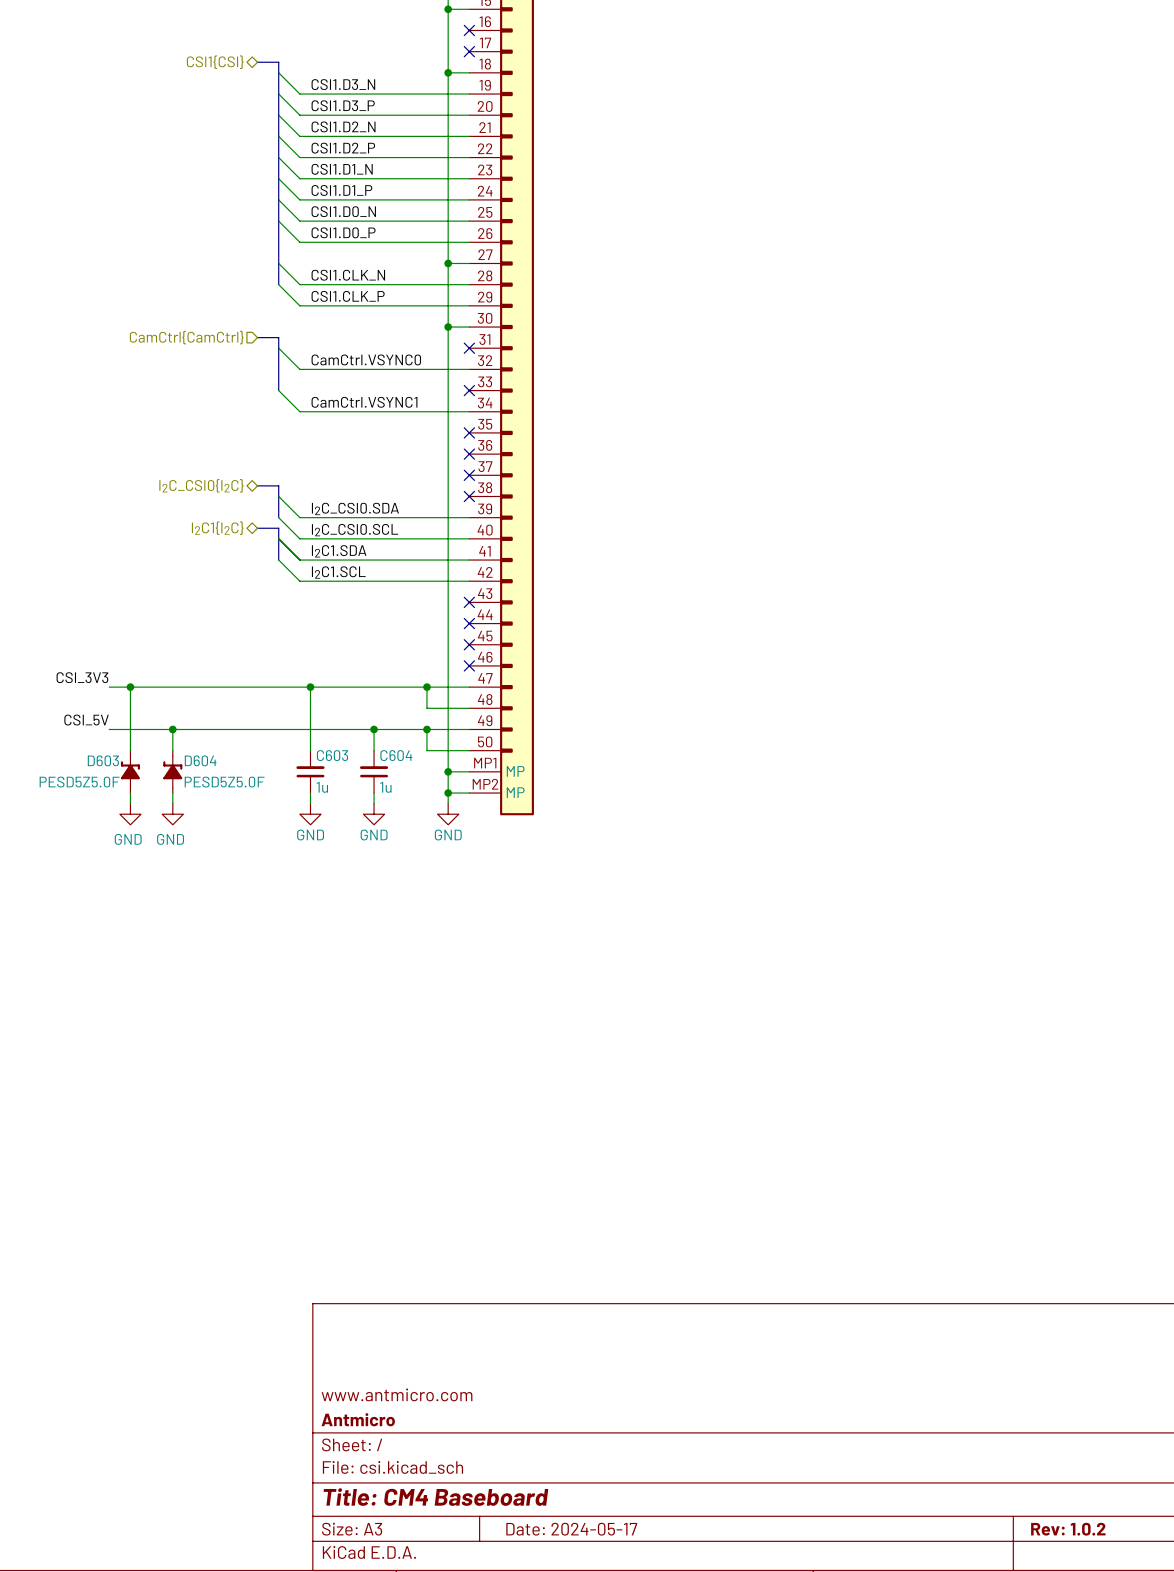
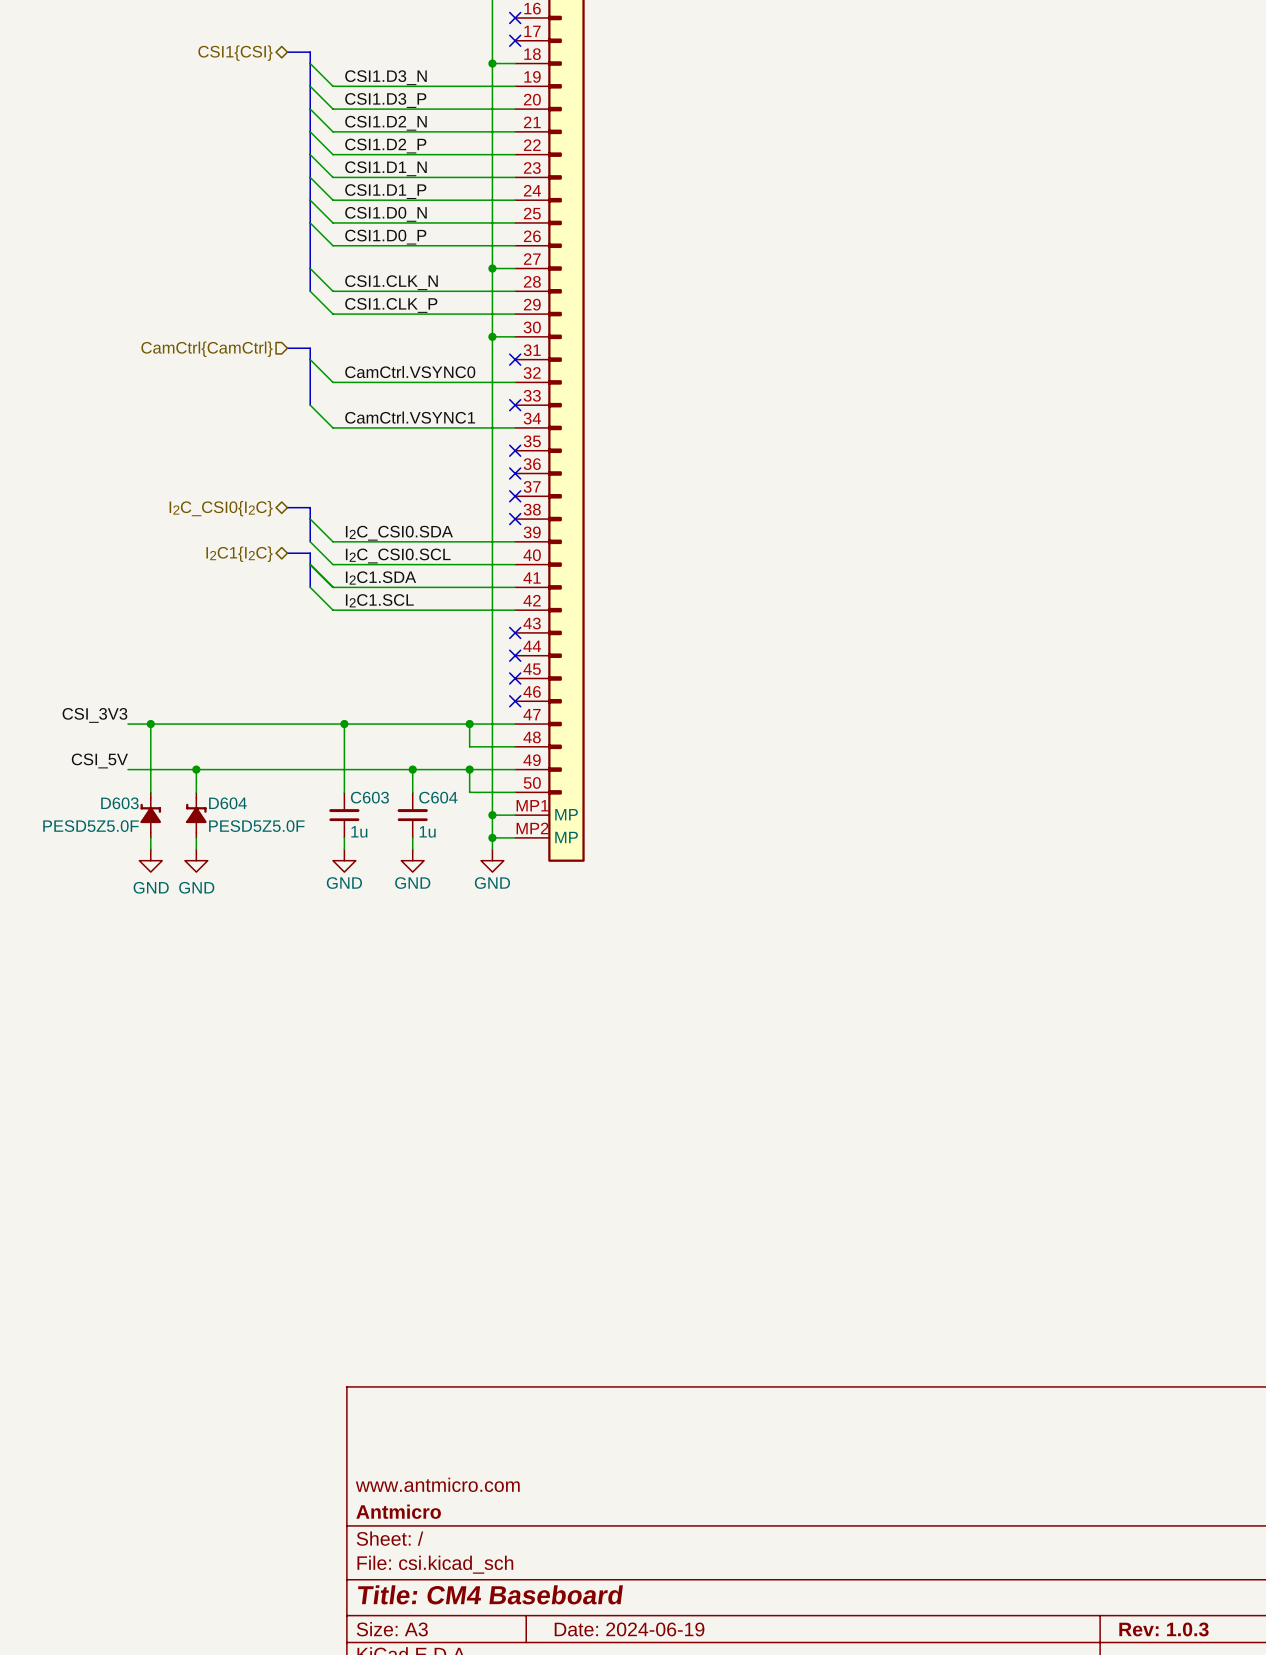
title block: Date: 2024-05-17 (571, 1529) -> Date: 2024-06-19 (629, 1629)
title block: Rev: 1.0.2 (1068, 1529) -> Rev: 1.0.3 (1163, 1629)

